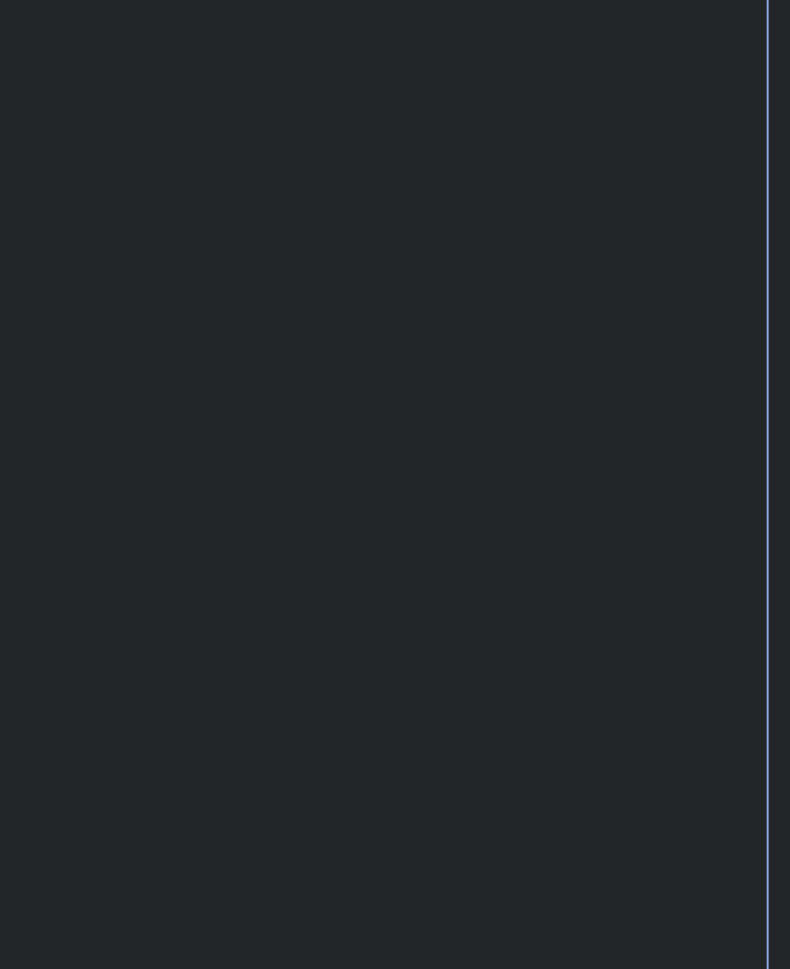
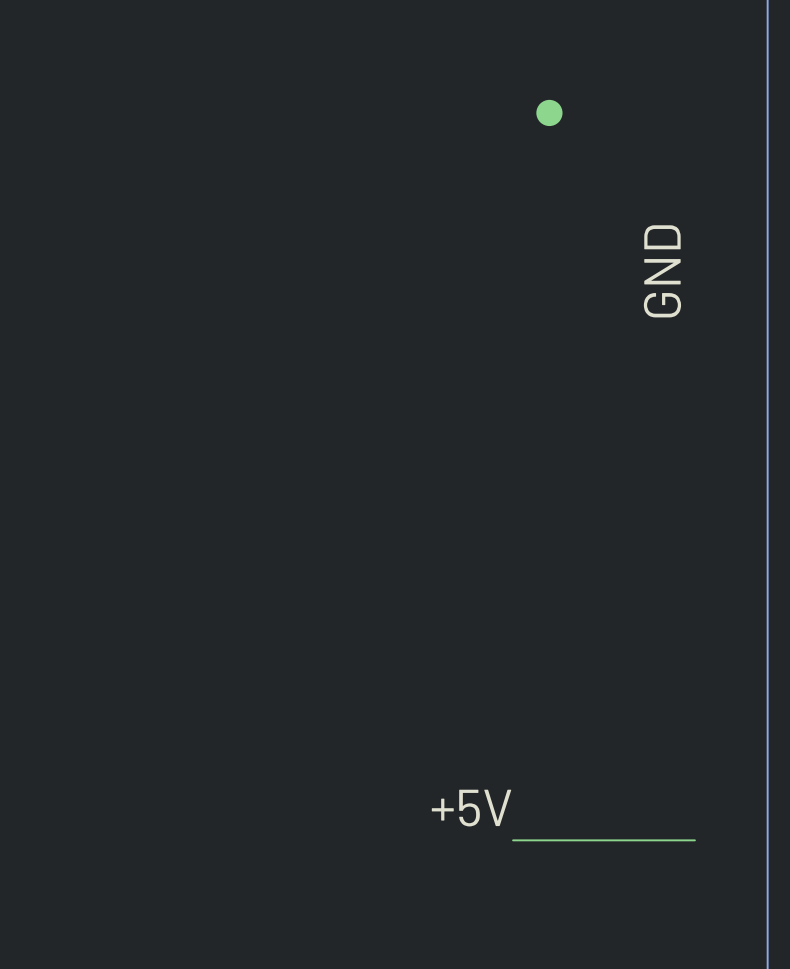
junction: none -> (549, 112)
label: none -> GND (662, 271)
label: none -> +5V (471, 808)
wire: none -> (513, 840) (694, 840)

